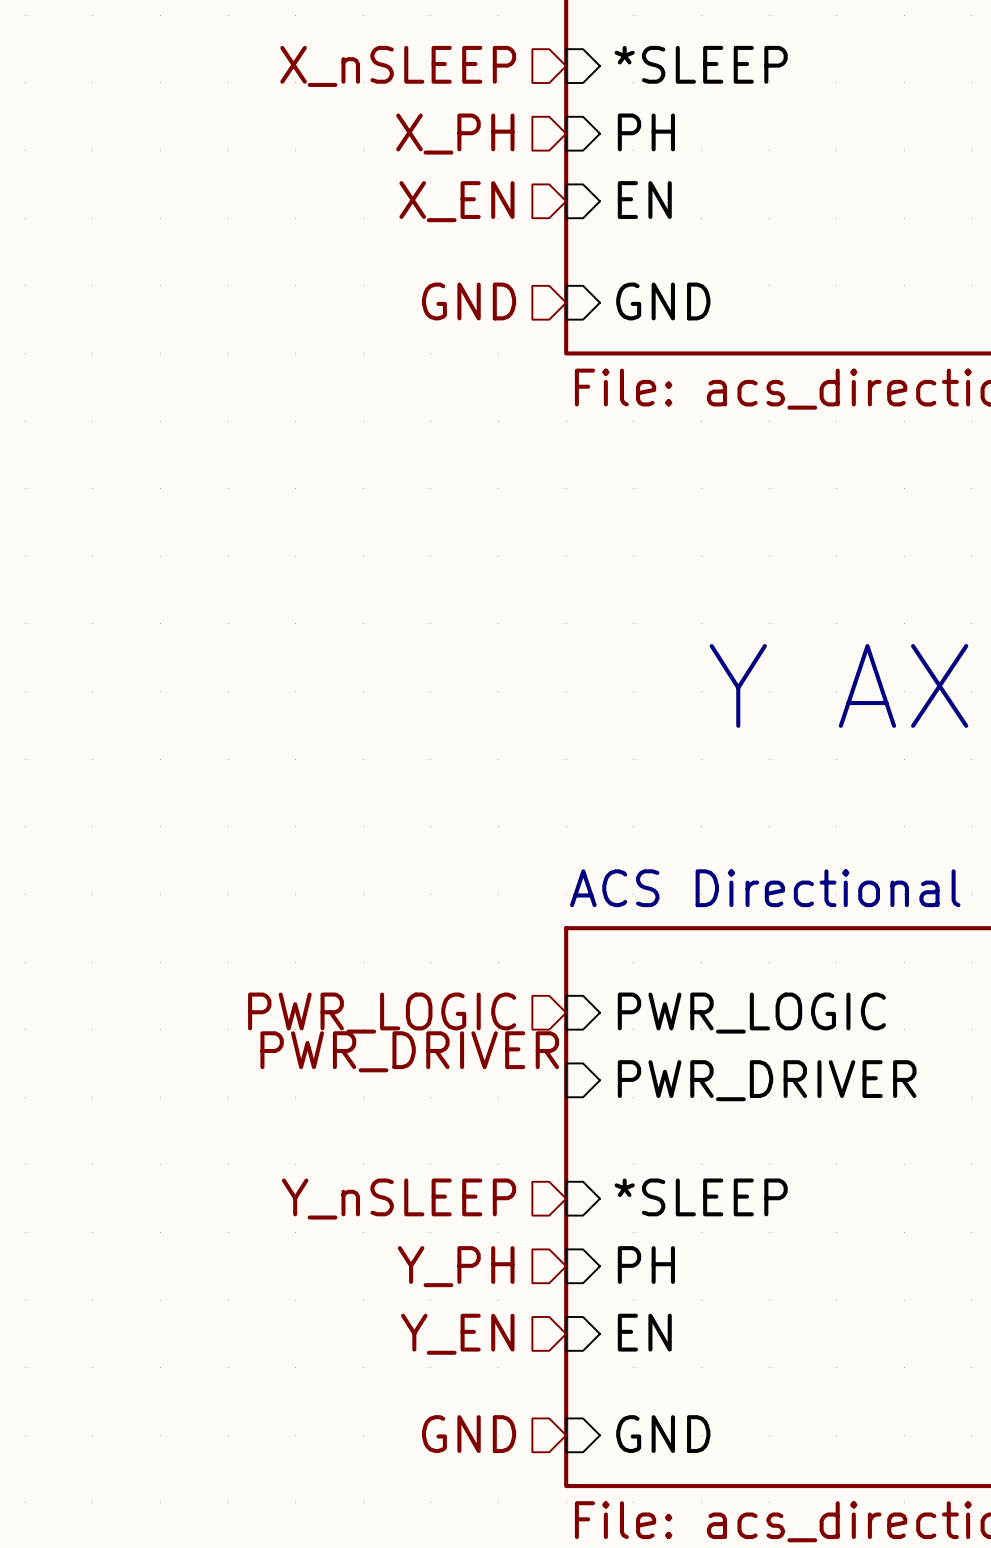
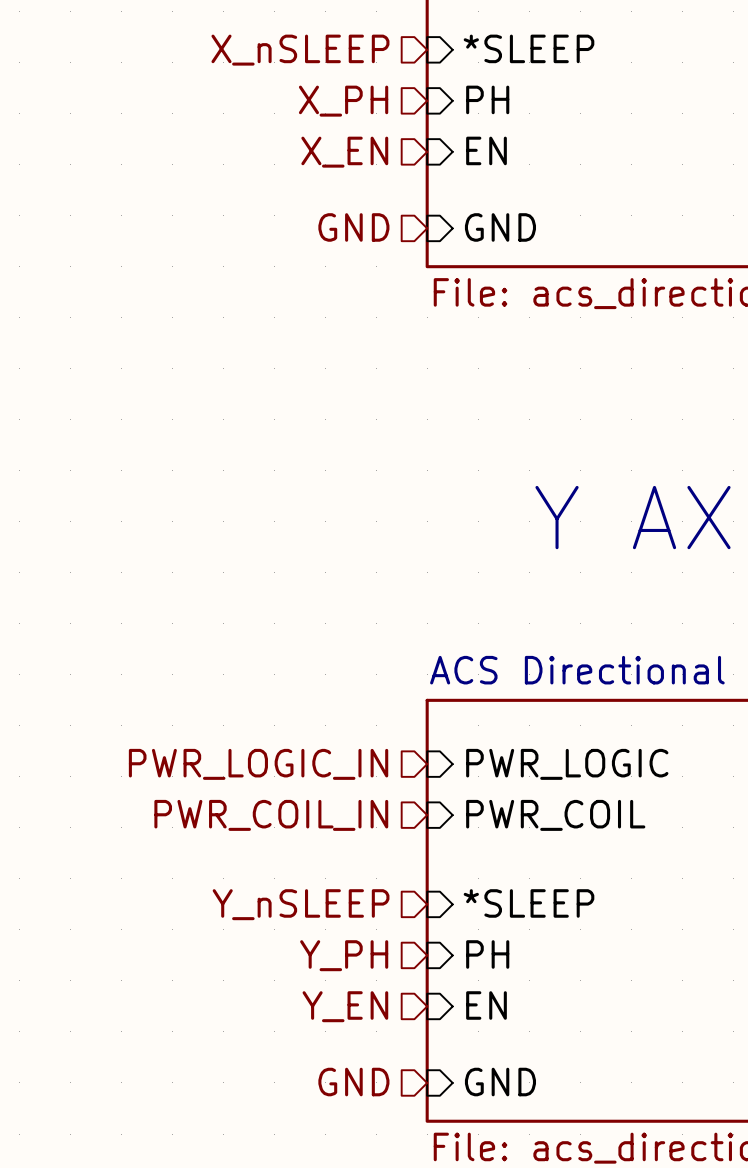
hierarchical label: PWR_LOGIC (382, 1013) -> PWR_LOGIC_IN (258, 764)
label: PWR_DRIVER (409, 1051) -> none
hierarchical label: none -> PWR_COIL_IN (271, 815)
sheet pin: PWR_DRIVER (767, 1080) -> PWR_COIL (555, 815)

